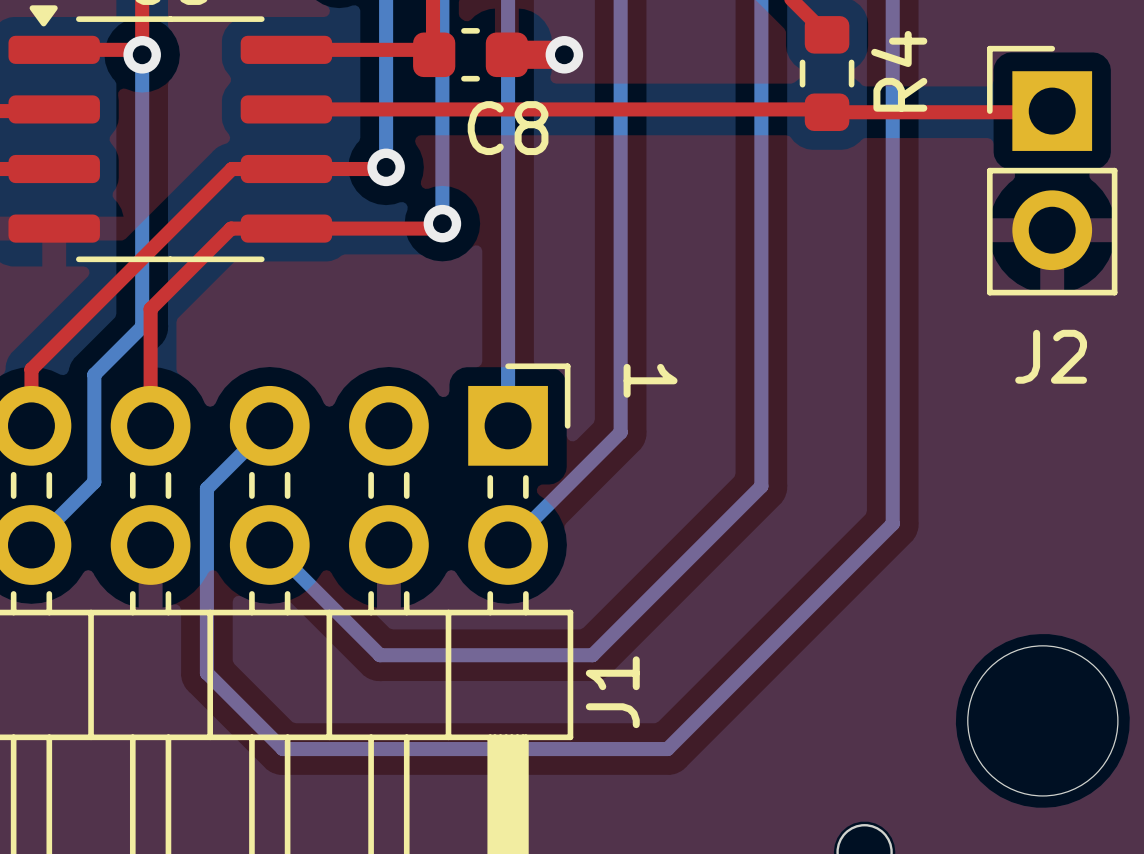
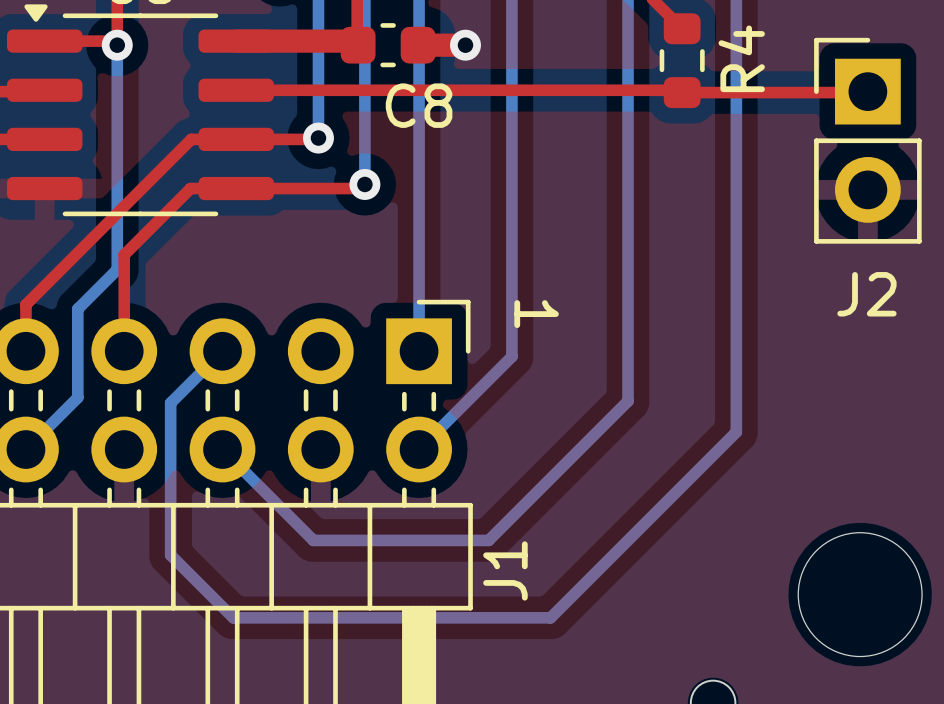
top track width: thin (286, 49) (429, 49) (434, 54) -> thick (236, 41) (354, 41) (358, 45)

